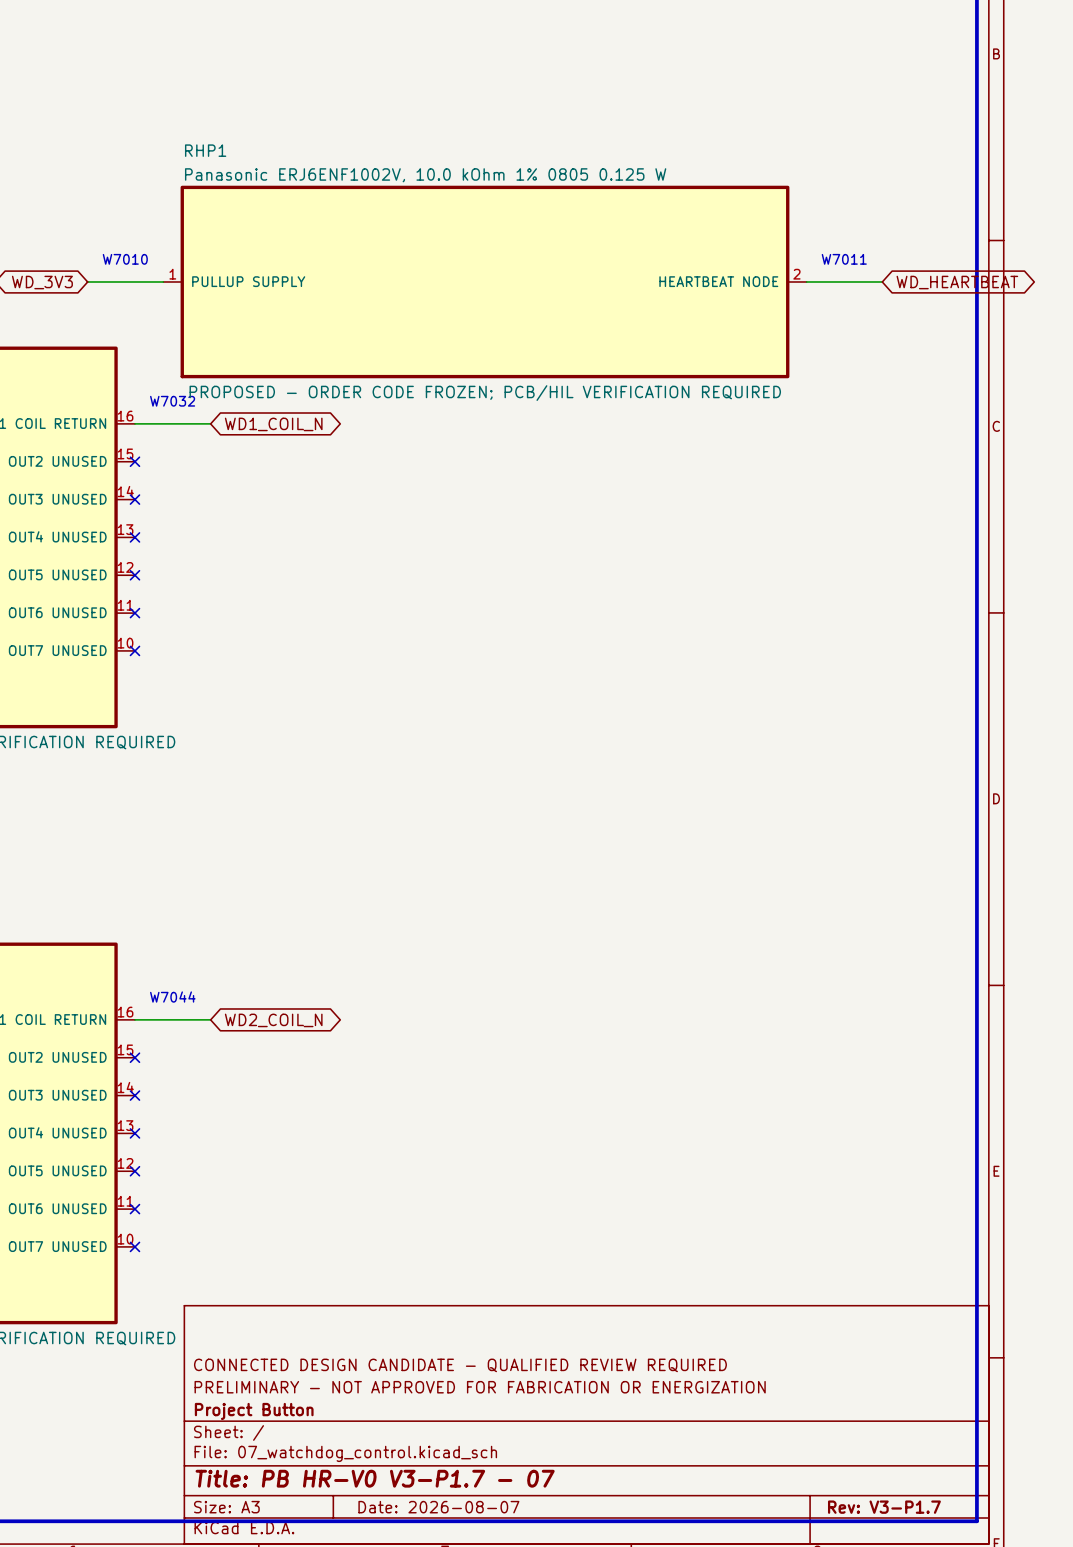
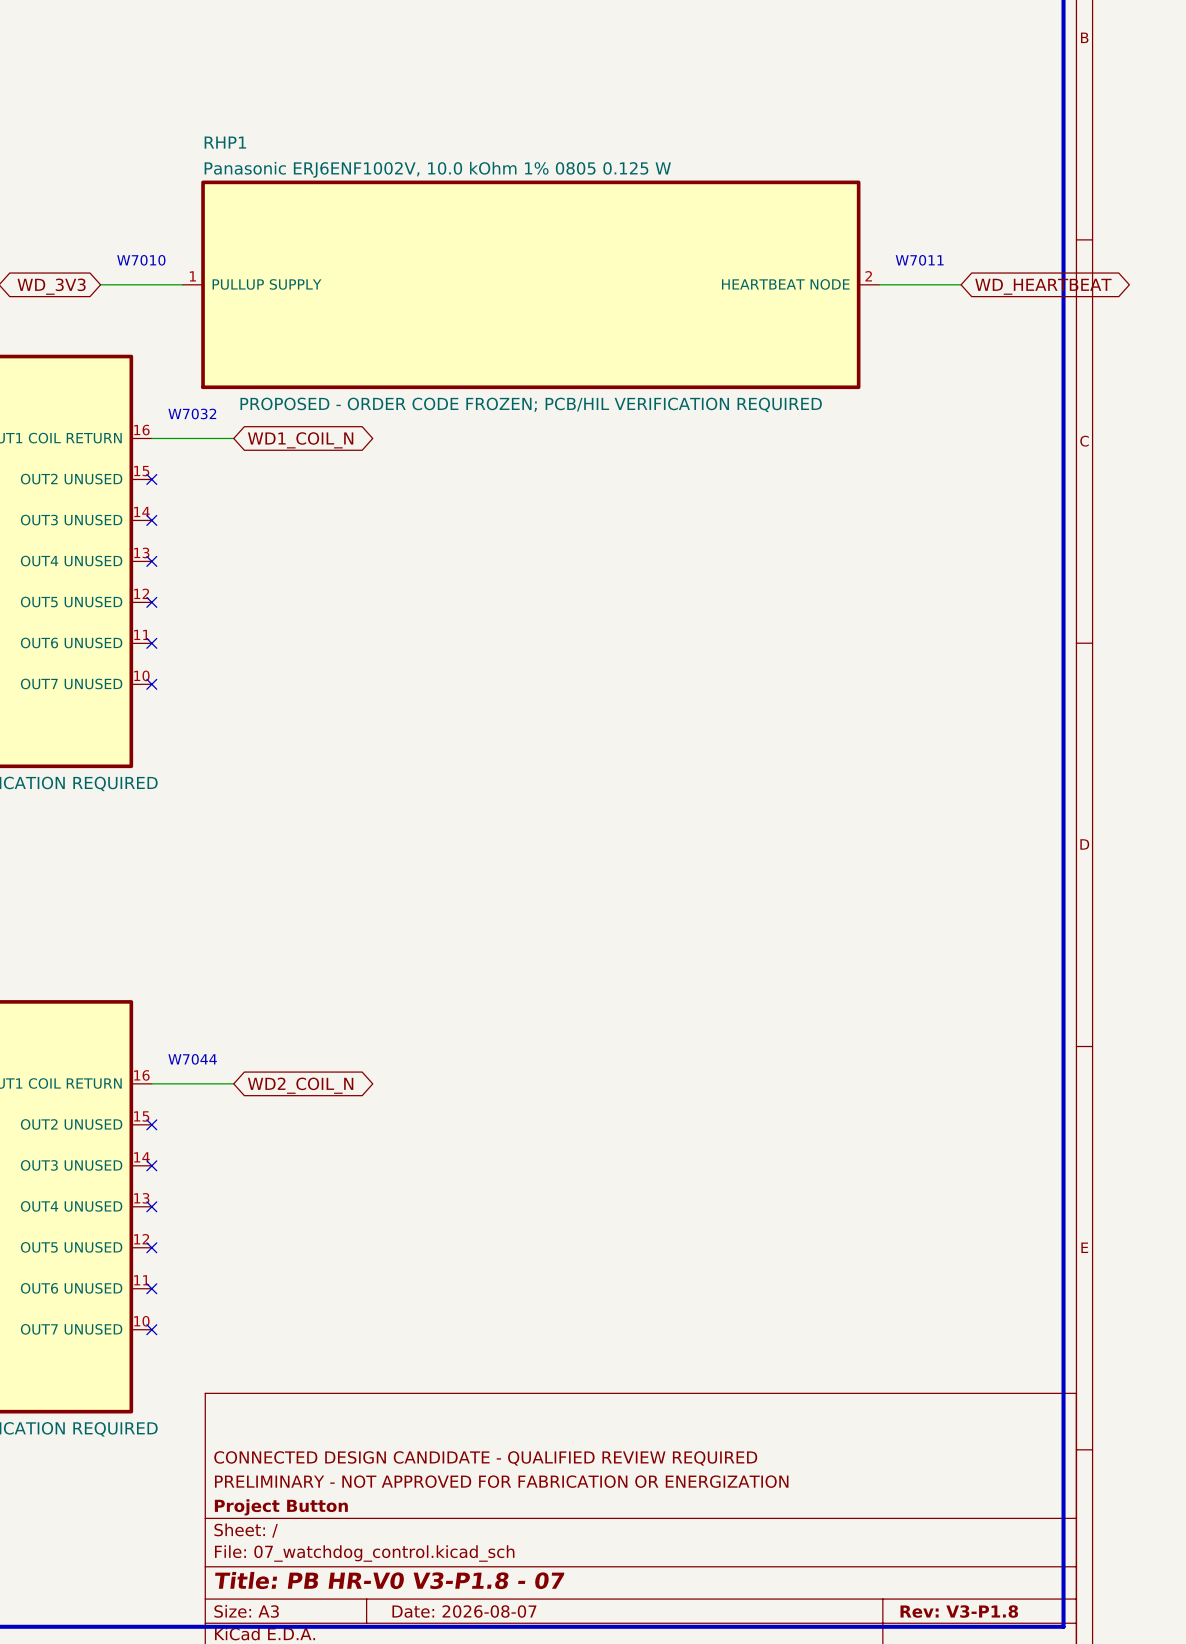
title block: Title: PB HR-V0 V3-P1.7 - 07 (375, 1478) -> Title: PB HR-V0 V3-P1.8 - 07 (389, 1580)
title block: Rev: V3-P1.7 (884, 1507) -> Rev: V3-P1.8 (959, 1611)

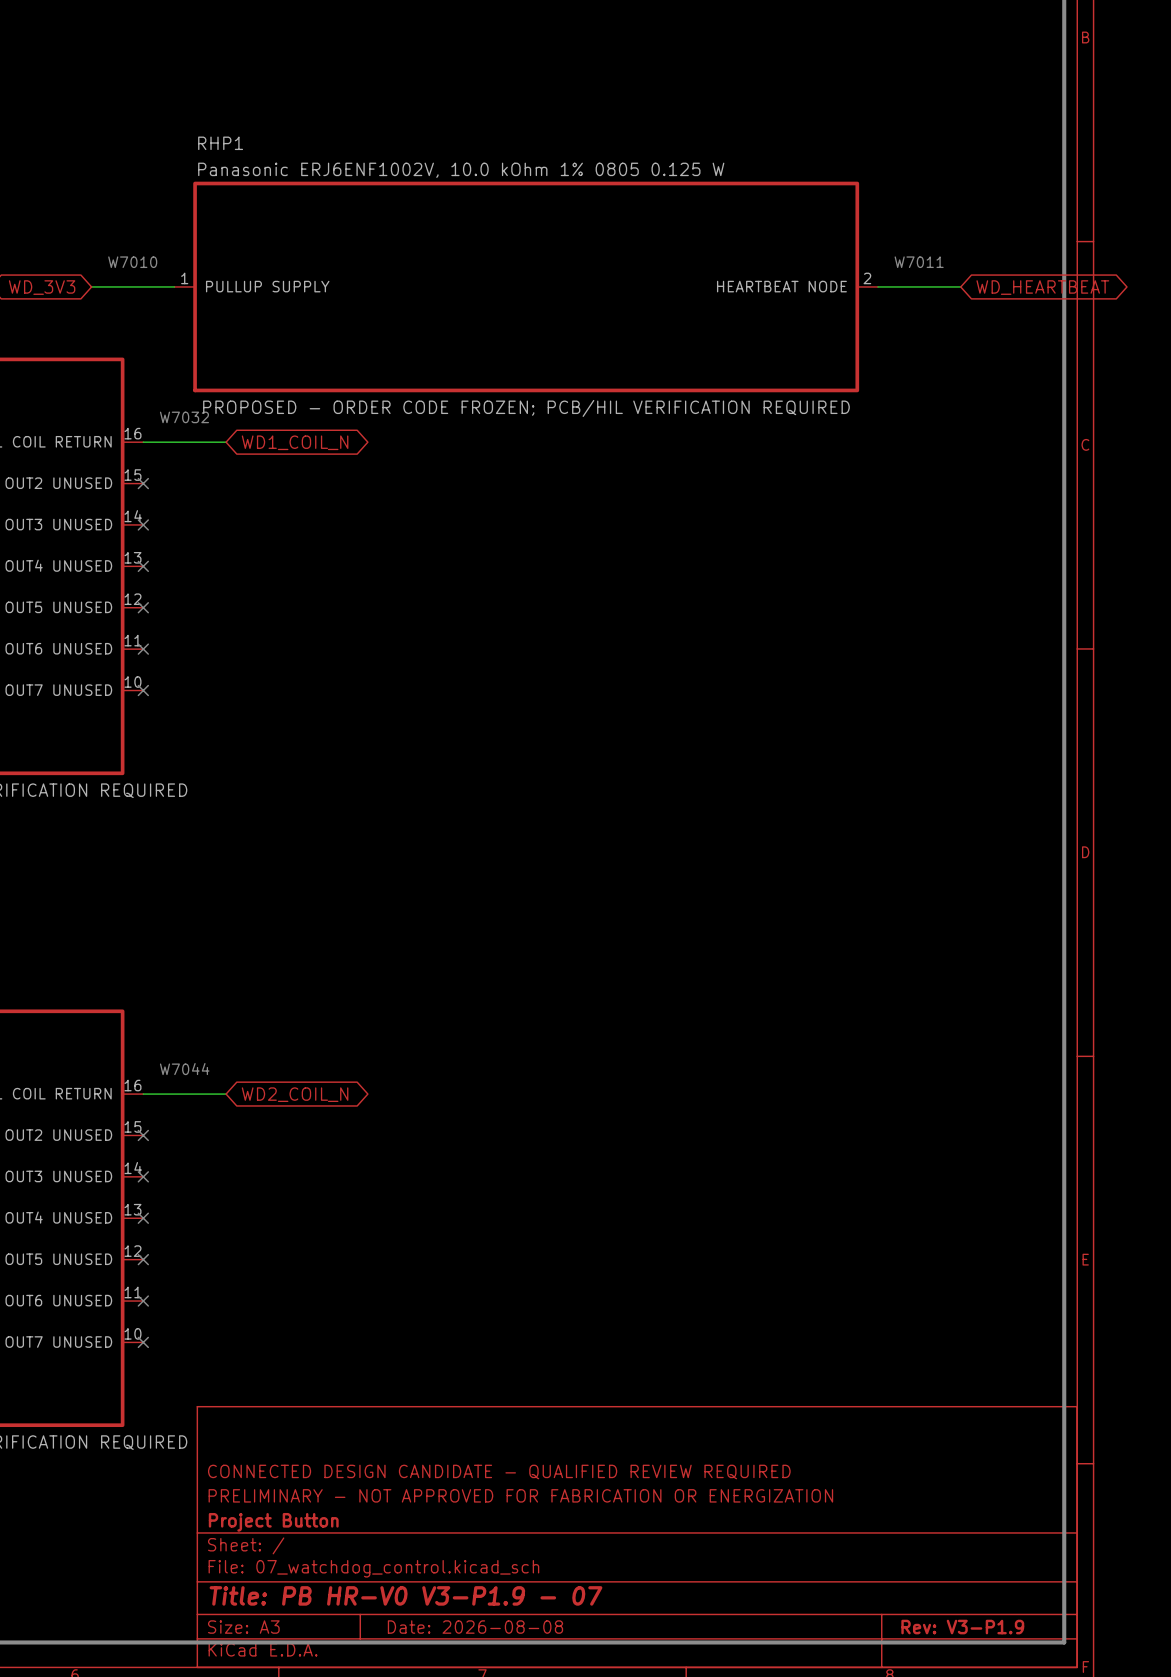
title block: Title: PB HR-V0 V3-P1.8 - 07 (389, 1580) -> Title: PB HR-V0 V3-P1.9 - 07 (405, 1595)
title block: Date: 2026-08-07 (464, 1611) -> Date: 2026-08-08 (475, 1627)
title block: Rev: V3-P1.8 (959, 1611) -> Rev: V3-P1.9 (962, 1627)

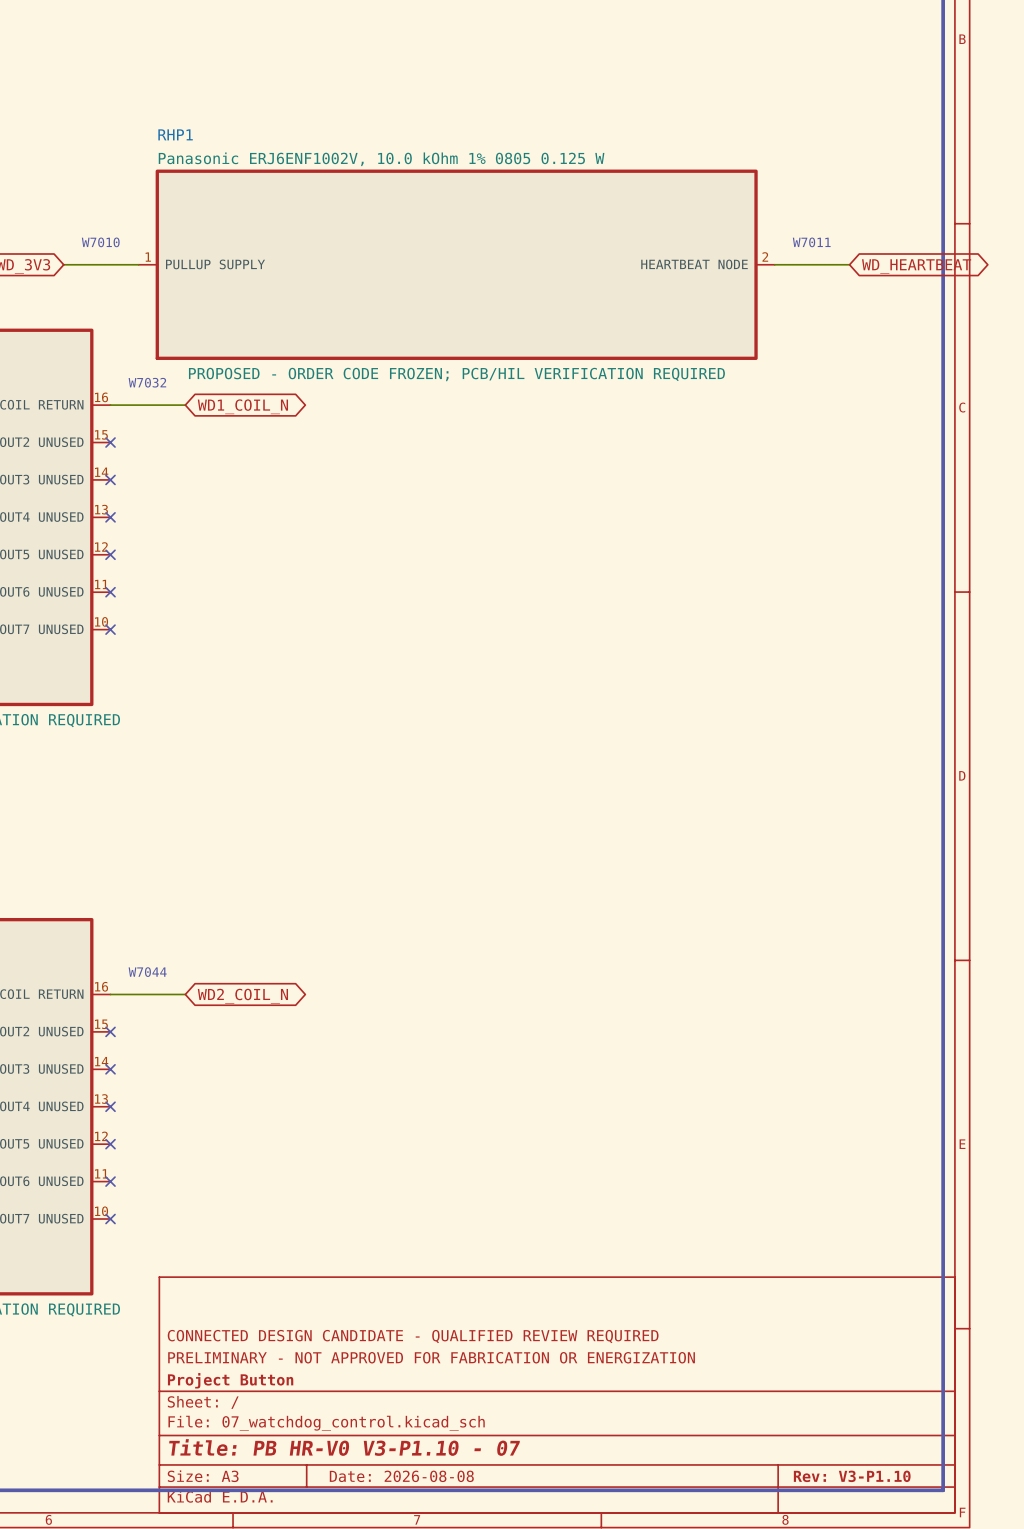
title block: Title: PB HR-V0 V3-P1.9 - 07 (405, 1595) -> Title: PB HR-V0 V3-P1.10 - 07 (344, 1447)
title block: Rev: V3-P1.9 (962, 1627) -> Rev: V3-P1.10 (852, 1476)

